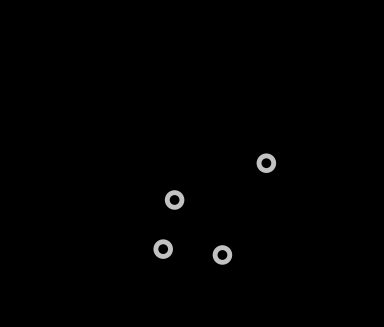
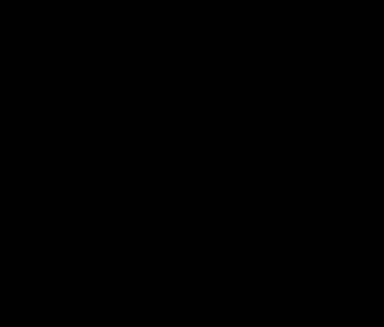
via: (266, 163) -> none
via: (174, 199) -> none
via: (163, 249) -> none
via: (222, 254) -> none

